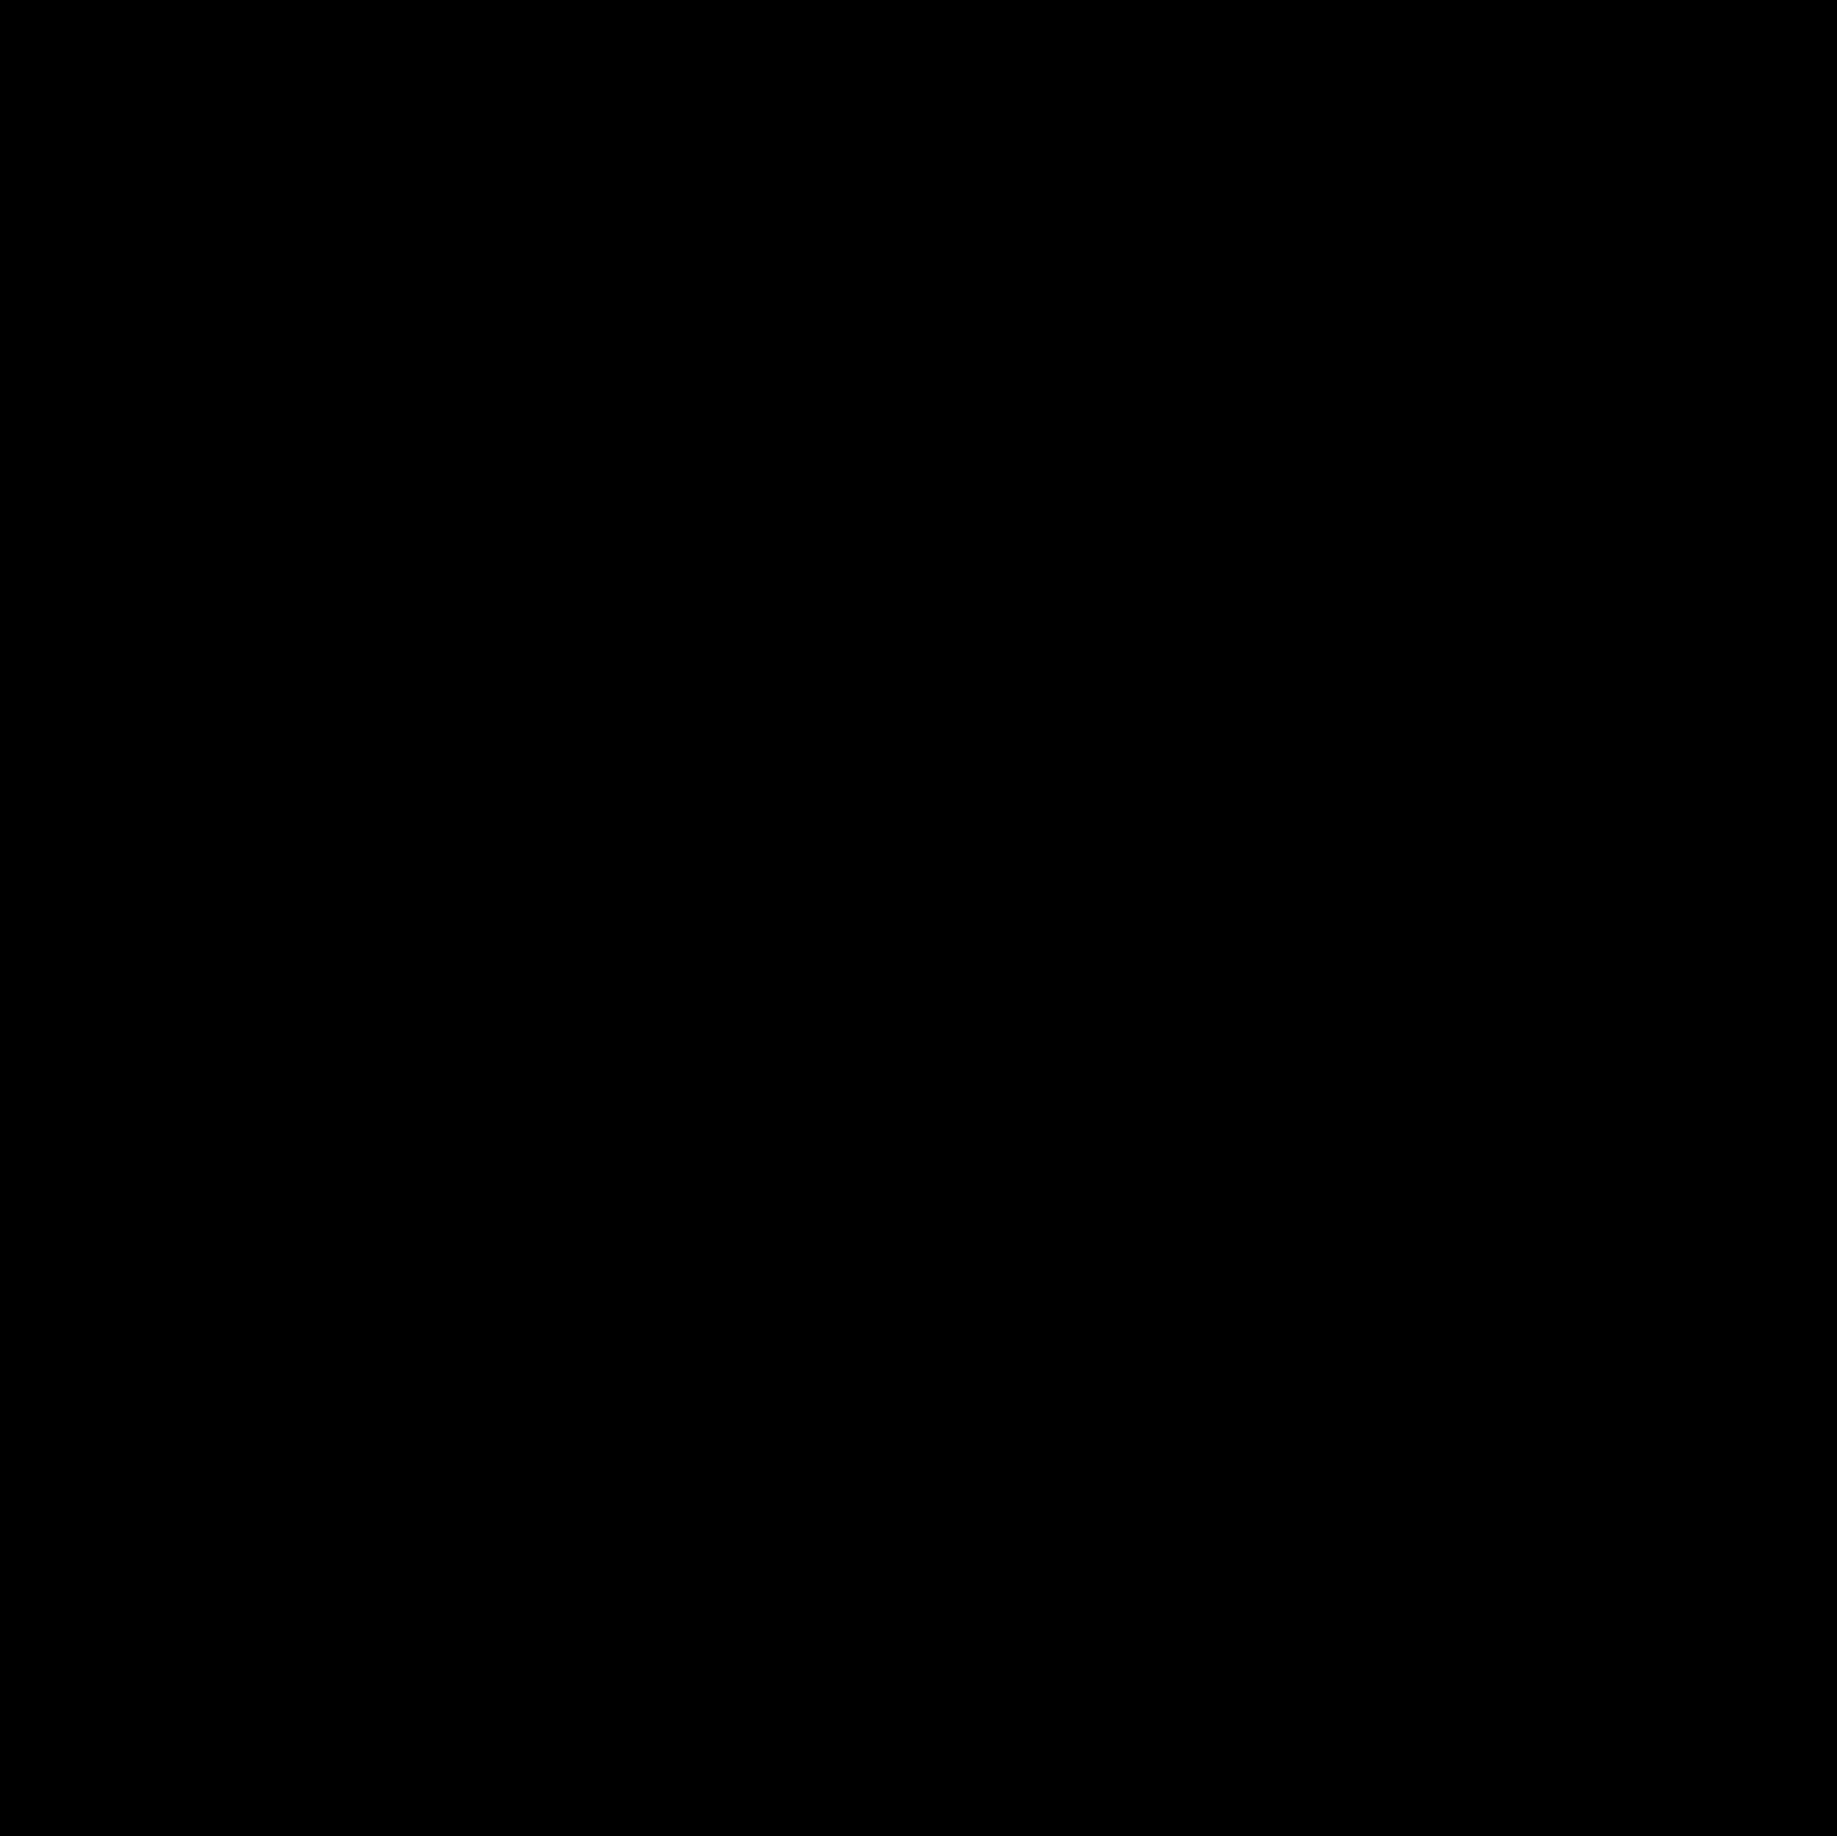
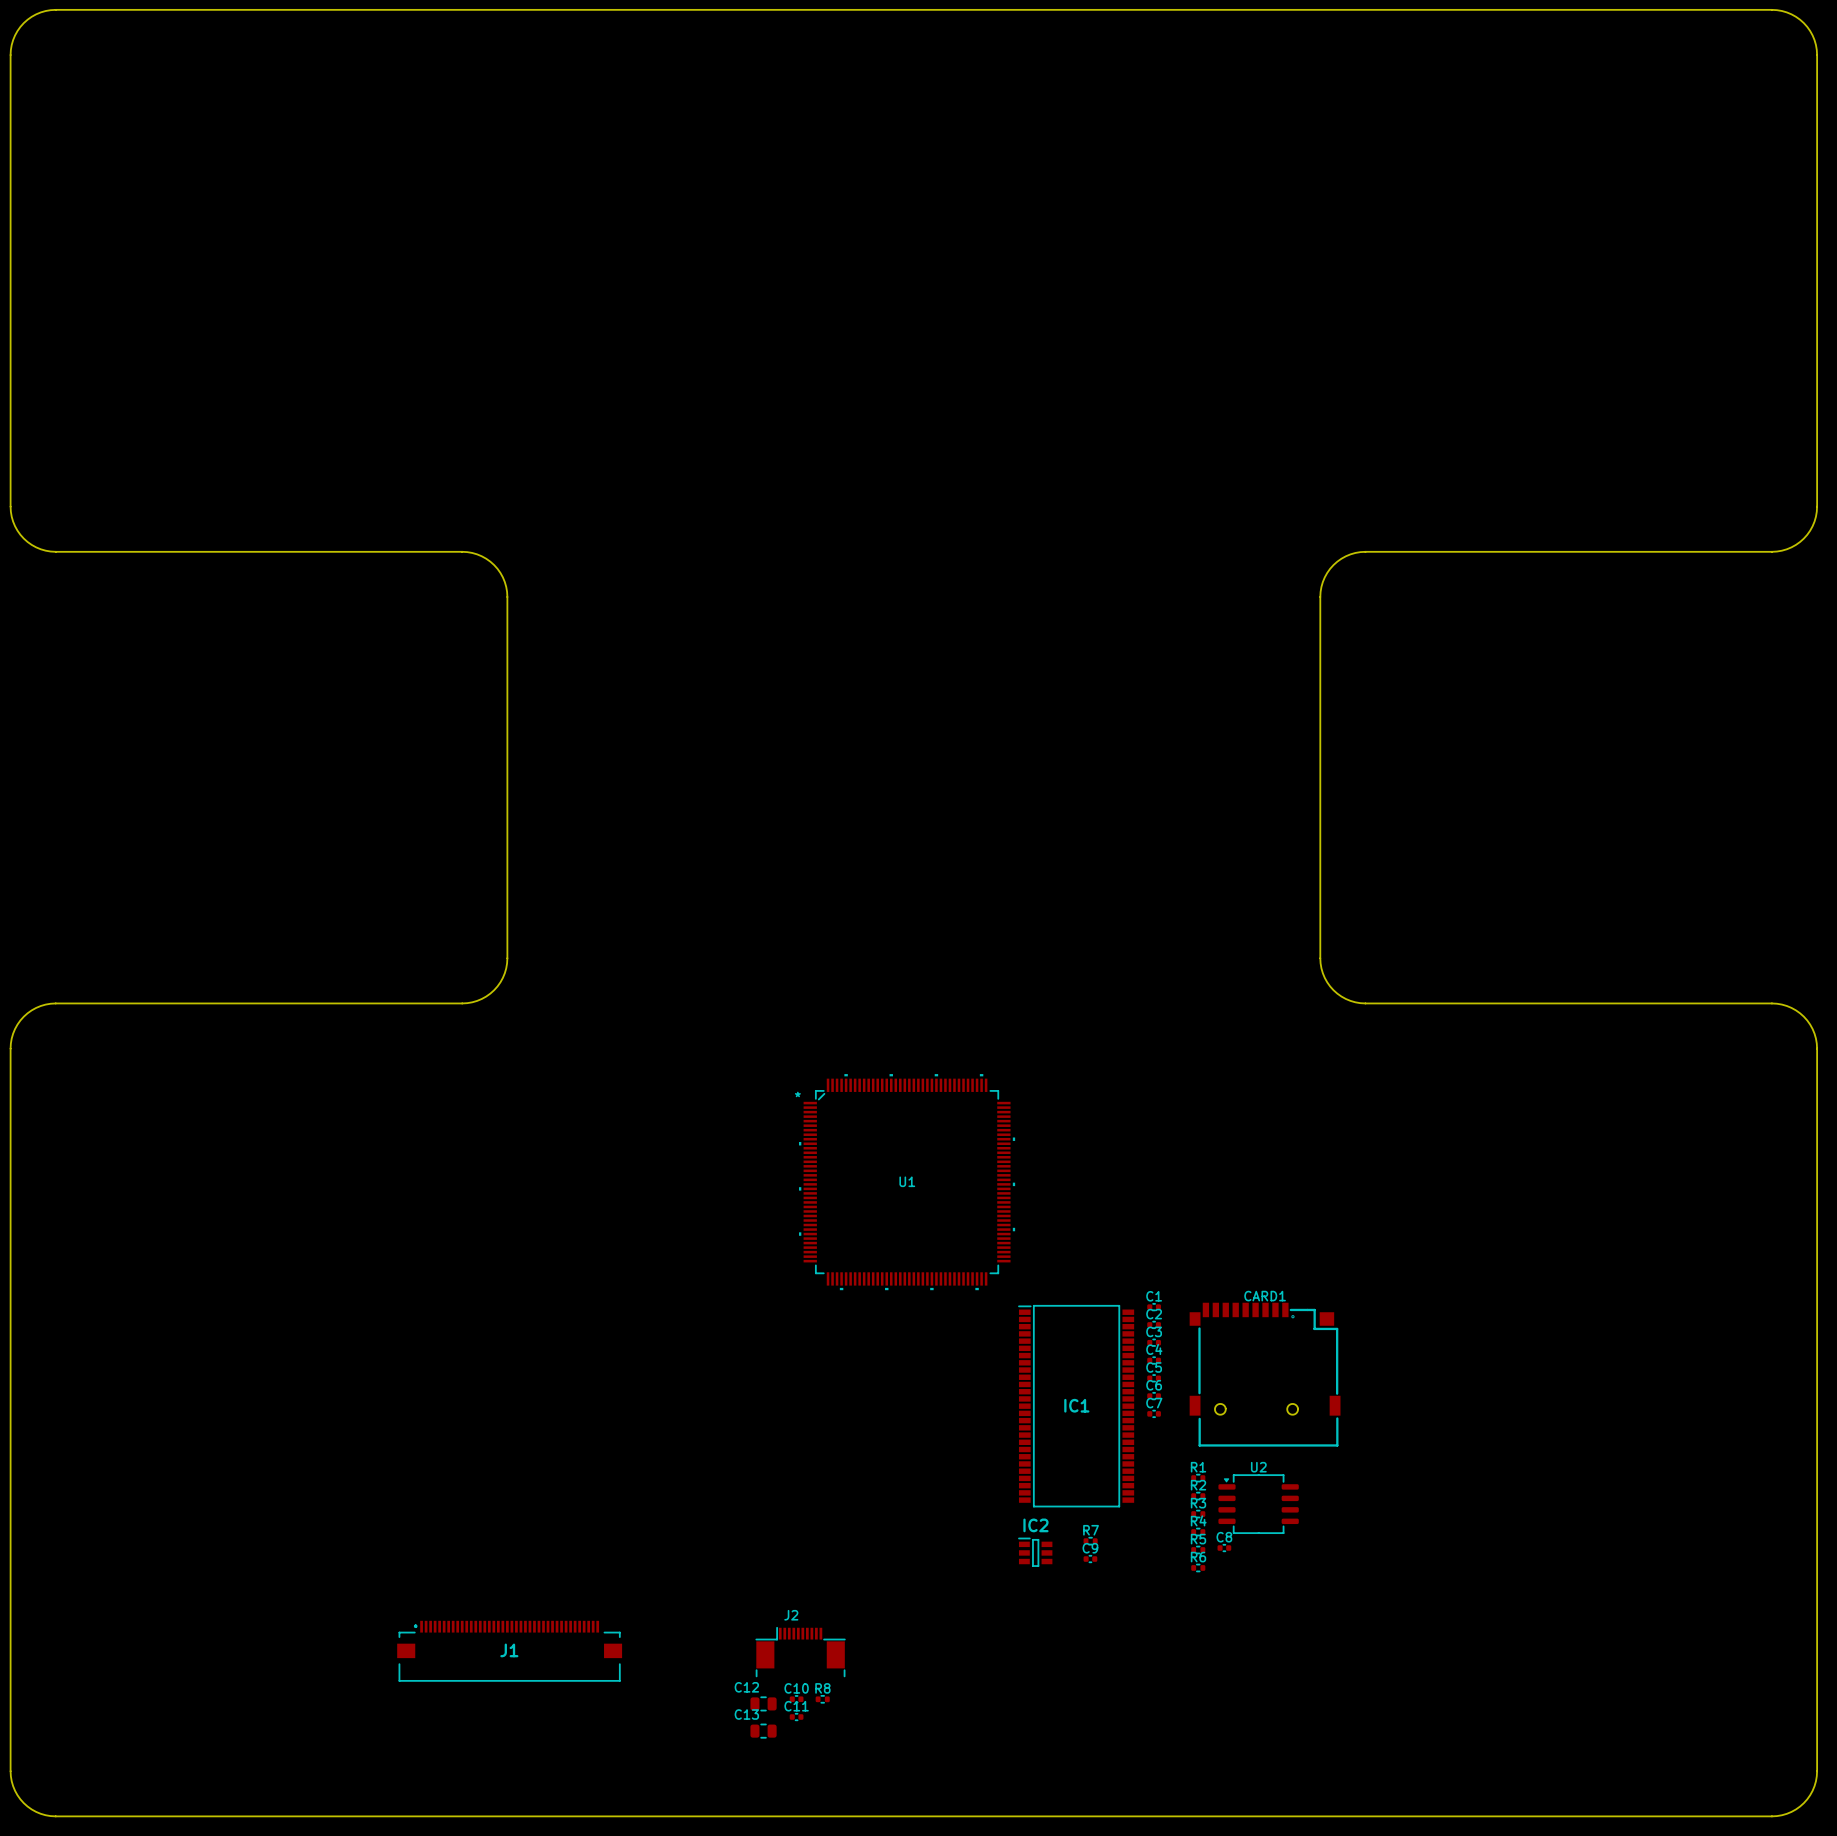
board edge: none -> (55, 9) (1771, 9) (1786, 12) (1803, 23) (1814, 40) (1817, 55) (1817, 506) (1814, 521) (1807, 534) (1791, 547) (1771, 551) (1360, 552) (1345, 556) (1333, 565) (1322, 582) (1320, 596) (1320, 958) (1324, 977) (1337, 993) (1350, 1000) (1365, 1003) (1776, 1003) (1791, 1007) (1800, 1013) (1807, 1020) (1814, 1033) (1817, 1048) (1817, 1771) (1812, 1790) (1803, 1803) (1786, 1813) (1771, 1816) (55, 1816) (40, 1813) (23, 1803) (13, 1786) (10, 1771) (10, 1048) (11, 1038) (17, 1024) (31, 1010) (40, 1005) (55, 1003) (467, 1003) (481, 998) (494, 990) (504, 973) (507, 958) (507, 596) (502, 577) (490, 561) (477, 554) (462, 551) (50, 551) (31, 544) (20, 534) (15, 526) (10, 506) (10, 49) (17, 31) (27, 19) (40, 12) (55, 9)
U1: none -> (907, 1182)
C1: none -> (1154, 1307)
C2: none -> (1154, 1324)
C3: none -> (1154, 1342)
C4: none -> (1154, 1360)
CARD1: none -> (1265, 1374)
C5: none -> (1154, 1378)
C6: none -> (1154, 1396)
IC1: none -> (1076, 1406)
C7: none -> (1154, 1413)
R1: none -> (1198, 1478)
R2: none -> (1198, 1496)
U2: none -> (1258, 1504)
R3: none -> (1198, 1514)
R4: none -> (1198, 1532)
R7: none -> (1090, 1541)
C8: none -> (1224, 1548)
R5: none -> (1198, 1550)
IC2: none -> (1035, 1552)
C9: none -> (1090, 1559)
R6: none -> (1198, 1567)
J1: none -> (509, 1651)
J2: none -> (800, 1652)
C10: none -> (796, 1699)
R8: none -> (822, 1699)
C12: none -> (763, 1703)
C11: none -> (796, 1717)
C13: none -> (763, 1731)

